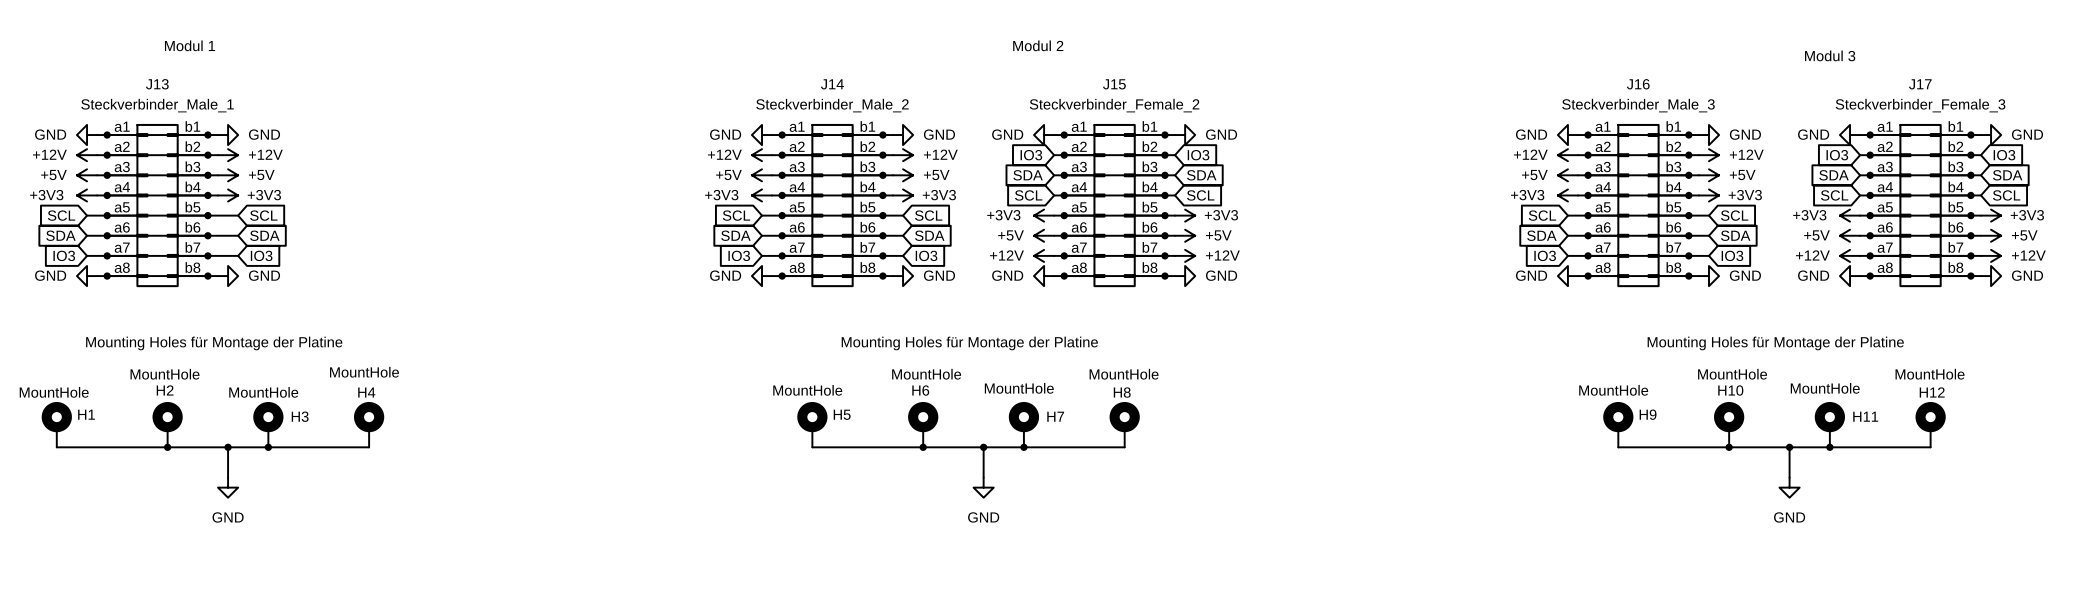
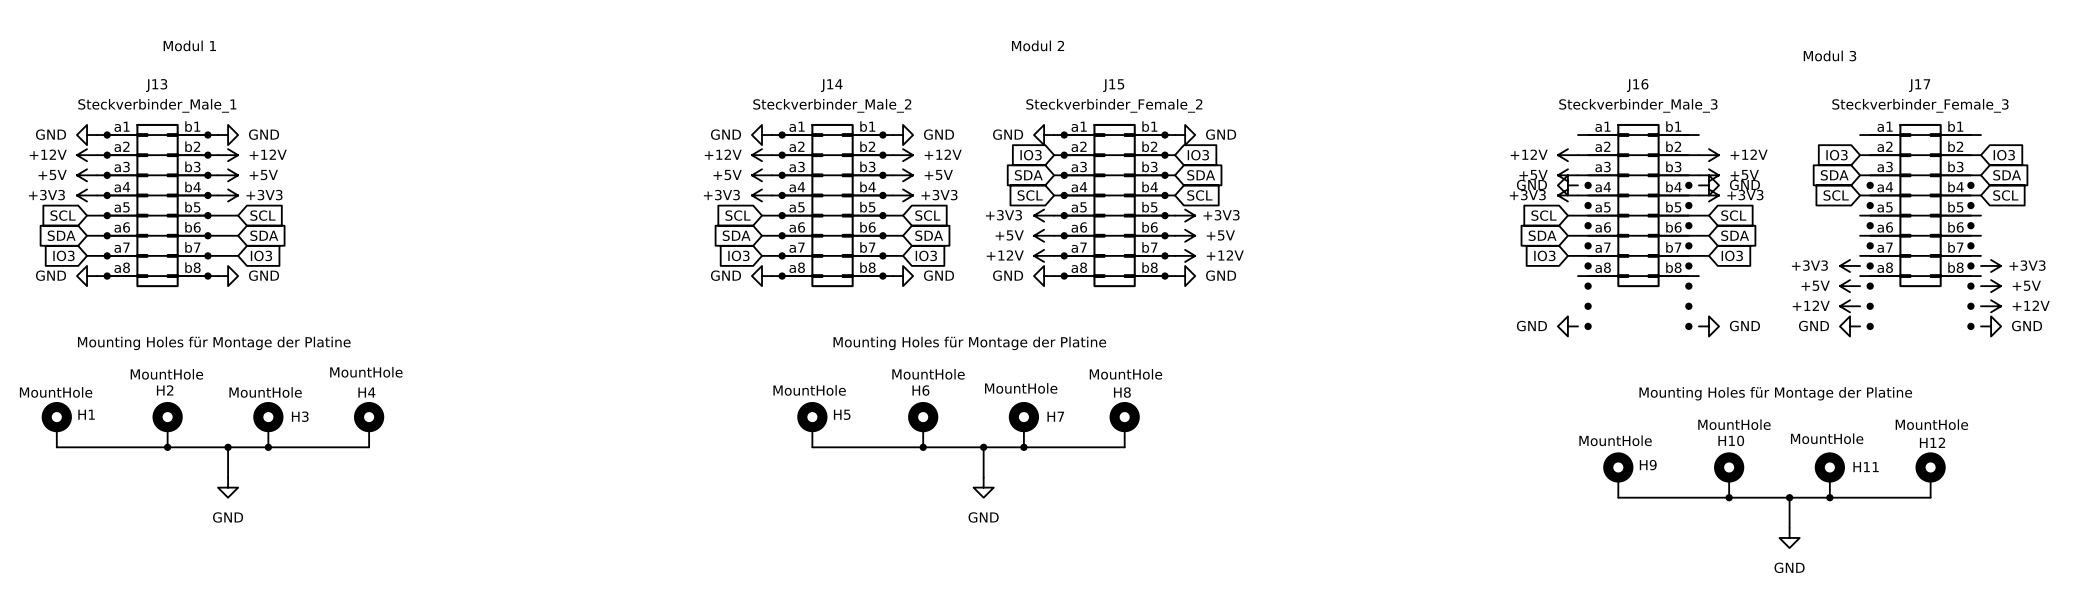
power symbol: GND (1567, 135) -> none
junction: (1588, 135) -> none
junction: (1688, 135) -> none
power symbol: GND (1708, 135) -> none
power symbol: GND (1850, 135) -> none
junction: (1870, 135) -> none
junction: (1970, 135) -> none
power symbol: GND (1991, 135) -> none
junction: (1588, 155) -> none
junction: (1688, 155) -> none
junction: (1870, 155) -> none
junction: (1970, 155) -> none
junction: (1588, 175) -> none
junction: (1688, 175) -> none
junction: (1870, 175) -> none
junction: (1970, 175) -> none
power symbol: none -> GND (1567, 185)
junction: none -> (1588, 185)
junction: none -> (1688, 185)
power symbol: none -> GND (1708, 185)
junction: none -> (1870, 185)
junction: none -> (1970, 185)
junction: (1588, 195) -> none
junction: (1688, 195) -> none
junction: (1870, 195) -> none
junction: (1970, 195) -> none
junction: none -> (1588, 205)
junction: none -> (1688, 205)
junction: none -> (1870, 205)
junction: none -> (1970, 205)
junction: (1588, 215) -> none
junction: (1688, 215) -> none
power symbol position: +3V3 (1850, 215) -> +3V3 (1850, 265)
junction: (1870, 215) -> none
junction: (1970, 215) -> none
power symbol position: +3V3 (1991, 215) -> +3V3 (1991, 265)
junction: none -> (1588, 225)
junction: none -> (1688, 225)
junction: none -> (1870, 225)
junction: none -> (1970, 225)
junction: (1588, 235) -> none
junction: (1688, 235) -> none
power symbol position: +5V (1850, 235) -> +5V (1850, 286)
junction: (1870, 235) -> none
junction: (1970, 235) -> none
power symbol position: +5V (1991, 235) -> +5V (1991, 286)
junction: none -> (1588, 245)
junction: none -> (1688, 245)
junction: none -> (1870, 245)
junction: none -> (1970, 245)
junction: (1588, 255) -> none
junction: (1688, 255) -> none
power symbol position: +12V (1850, 255) -> +12V (1850, 306)
junction: (1870, 255) -> none
junction: (1970, 255) -> none
power symbol position: +12V (1991, 255) -> +12V (1991, 306)
junction: none -> (1588, 265)
junction: none -> (1688, 265)
junction: none -> (1870, 265)
junction: none -> (1970, 265)
power symbol: GND (1567, 276) -> none
junction: (1588, 276) -> none
junction: (1688, 276) -> none
power symbol: GND (1708, 276) -> none
power symbol position: GND (1850, 276) -> GND (1850, 326)
junction: (1870, 276) -> none
junction: (1970, 276) -> none
power symbol position: GND (1991, 276) -> GND (1991, 326)
junction: none -> (1588, 286)
junction: none -> (1688, 286)
junction: none -> (1870, 286)
junction: none -> (1970, 286)
junction: none -> (1588, 306)
junction: none -> (1688, 306)
junction: none -> (1870, 306)
junction: none -> (1970, 306)
power symbol: none -> GND (1567, 326)
junction: none -> (1588, 326)
junction: none -> (1688, 326)
power symbol: none -> GND (1708, 326)
junction: none -> (1870, 326)
junction: none -> (1970, 326)
text position: Mounting Holes für Montage der Platine (1775, 343) -> Mounting Holes für Montage der Platine (1775, 393)
H9 position: (1618, 424) -> (1618, 475)
H10 position: (1729, 424) -> (1729, 475)
H11 position: (1829, 424) -> (1829, 475)
H12 position: (1930, 424) -> (1930, 475)
wire: (1618, 447) (1930, 447) -> (1618, 497) (1930, 497)
junction: (1729, 447) -> none
wire: (1789, 447) (1789, 477) -> (1789, 497) (1789, 527)
junction: (1789, 447) -> none
junction: (1829, 447) -> none
power symbol position: GND (1789, 487) -> GND (1789, 537)
junction: none -> (1729, 497)
junction: none -> (1789, 497)
junction: none -> (1829, 497)

